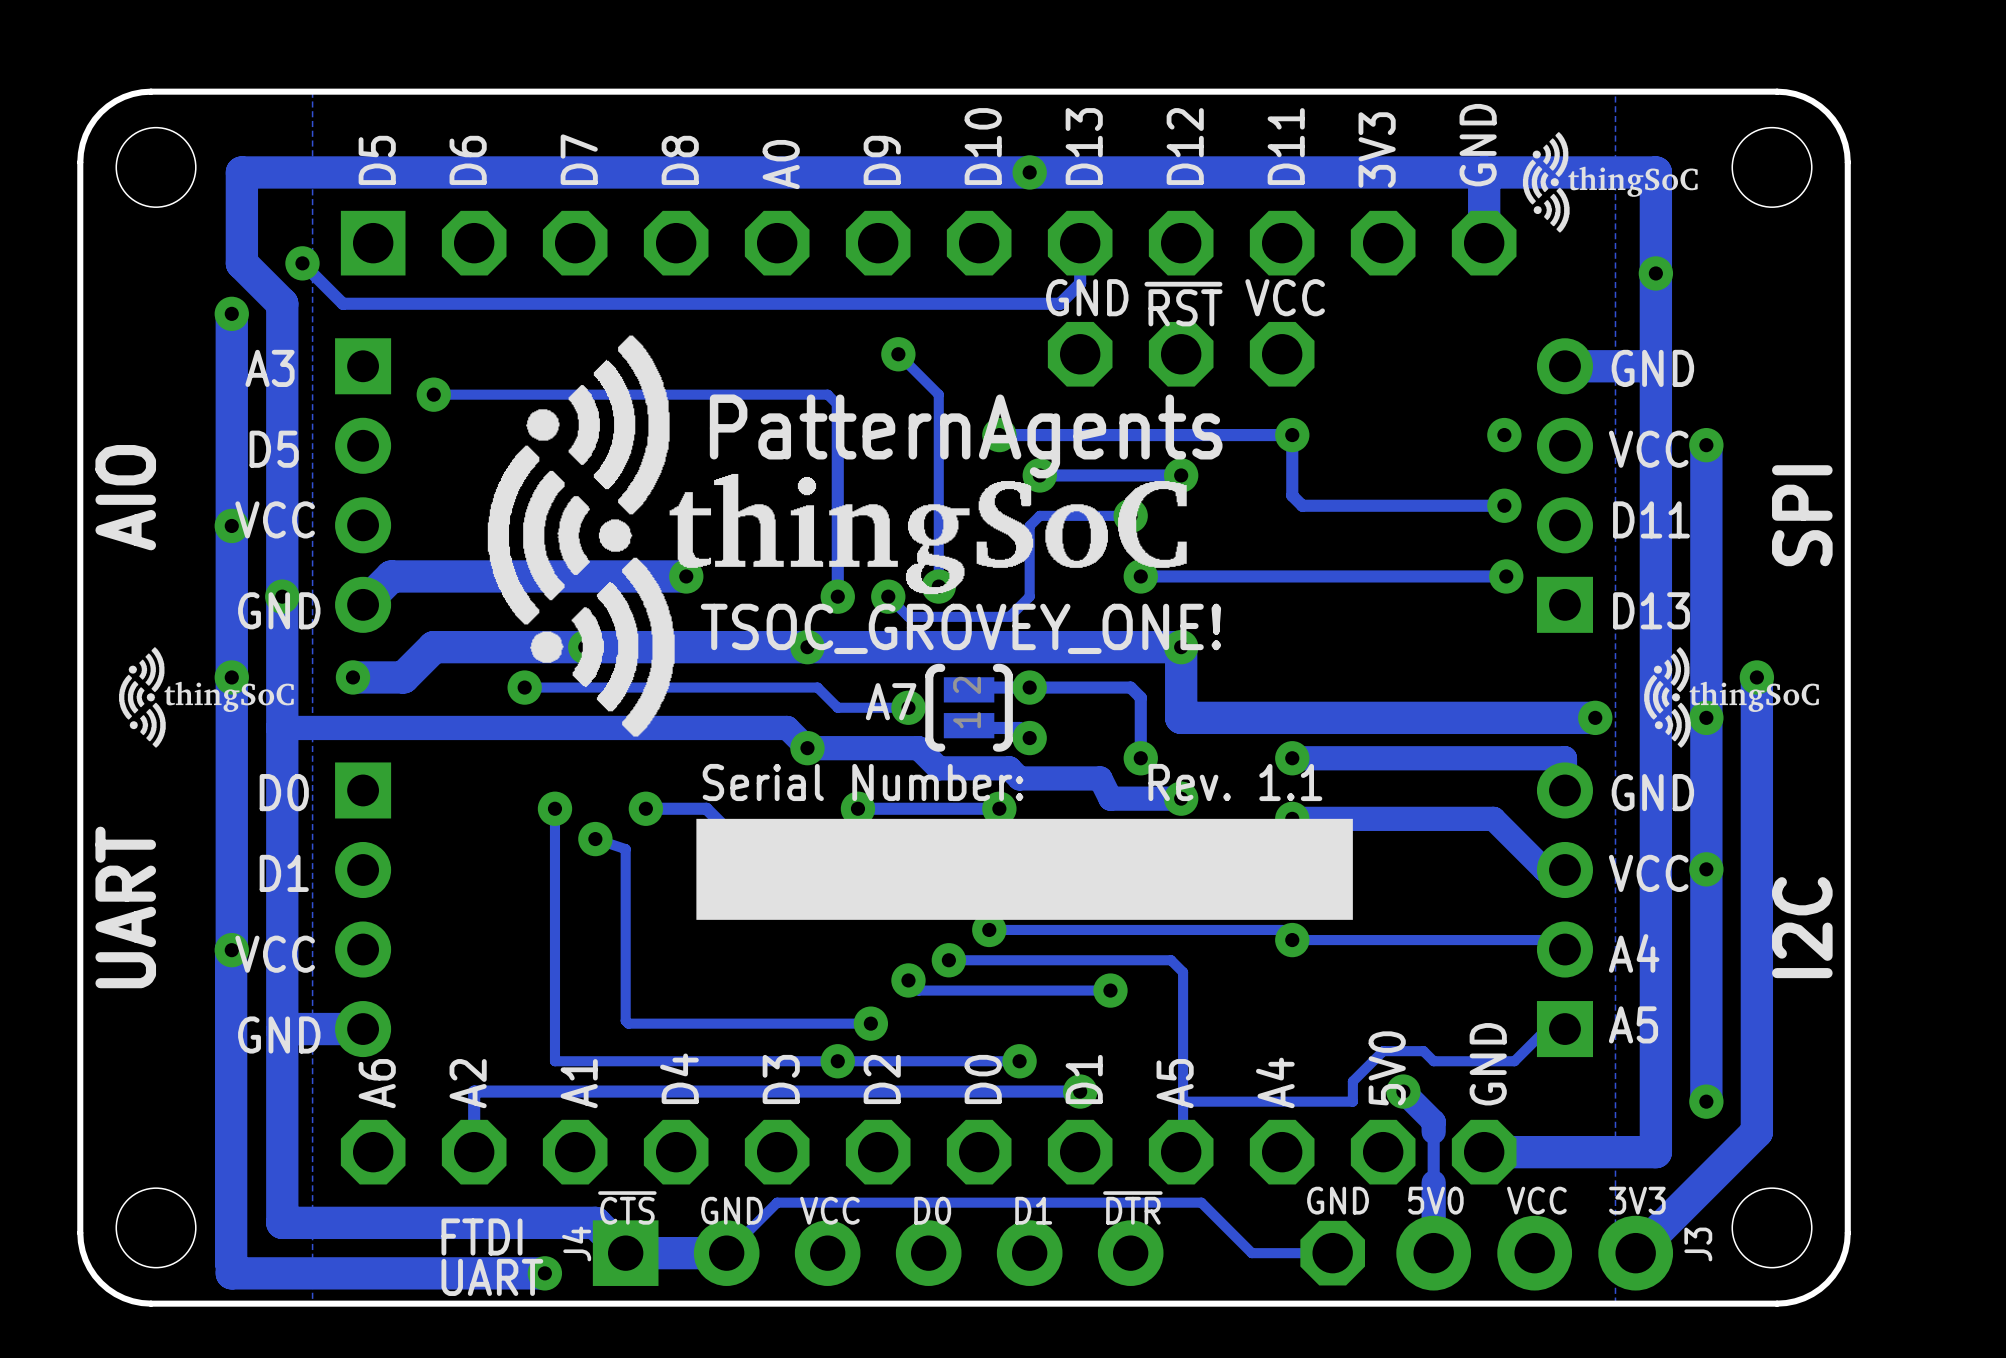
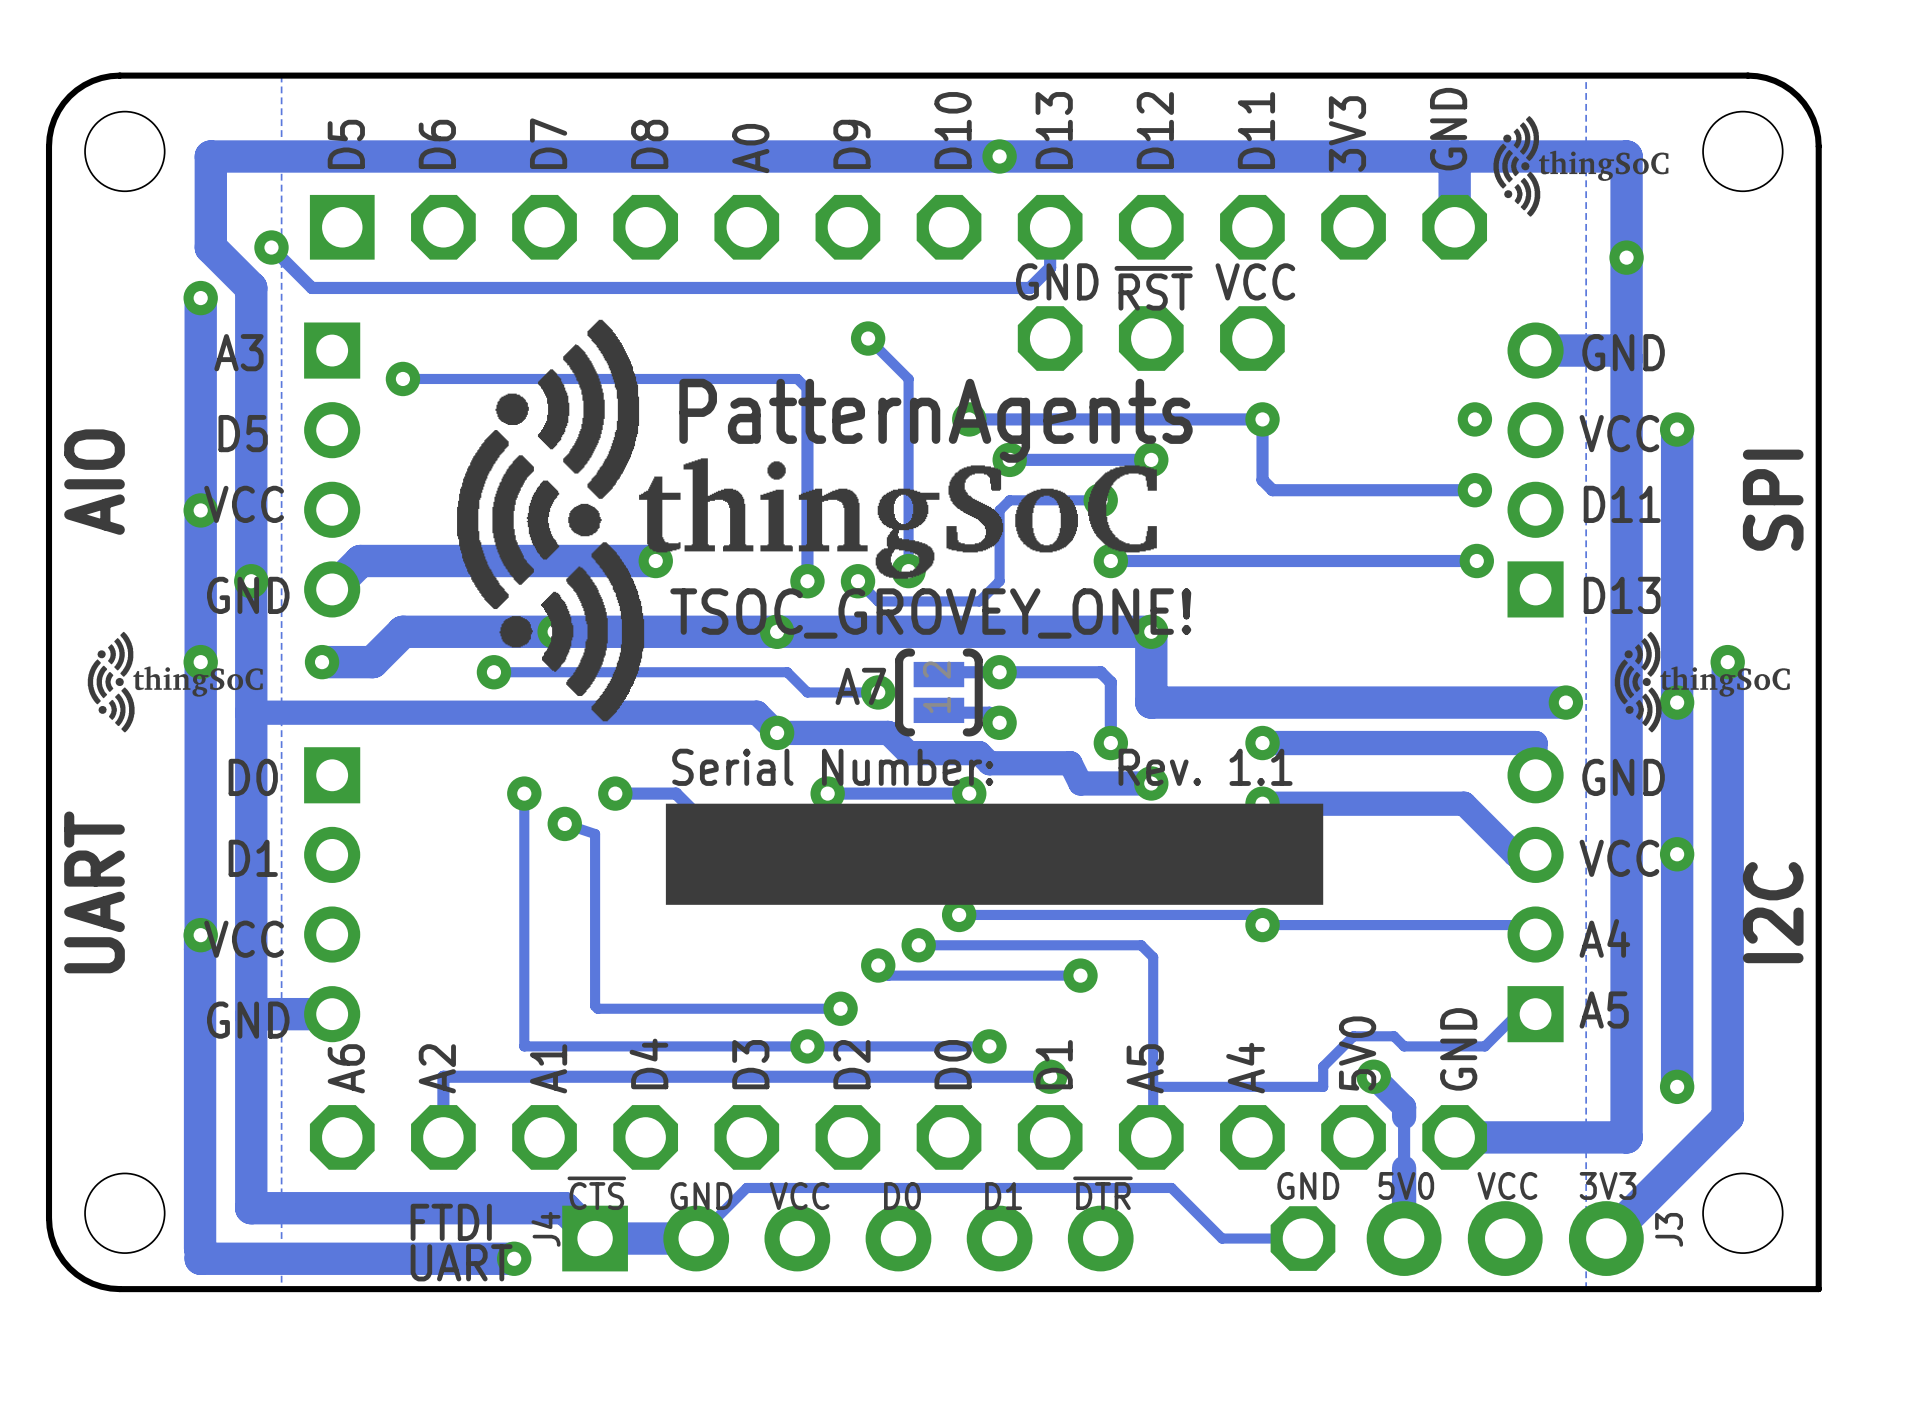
part footprint: [77, 88, 1851, 1307] -> [45, 72, 1822, 1293]

